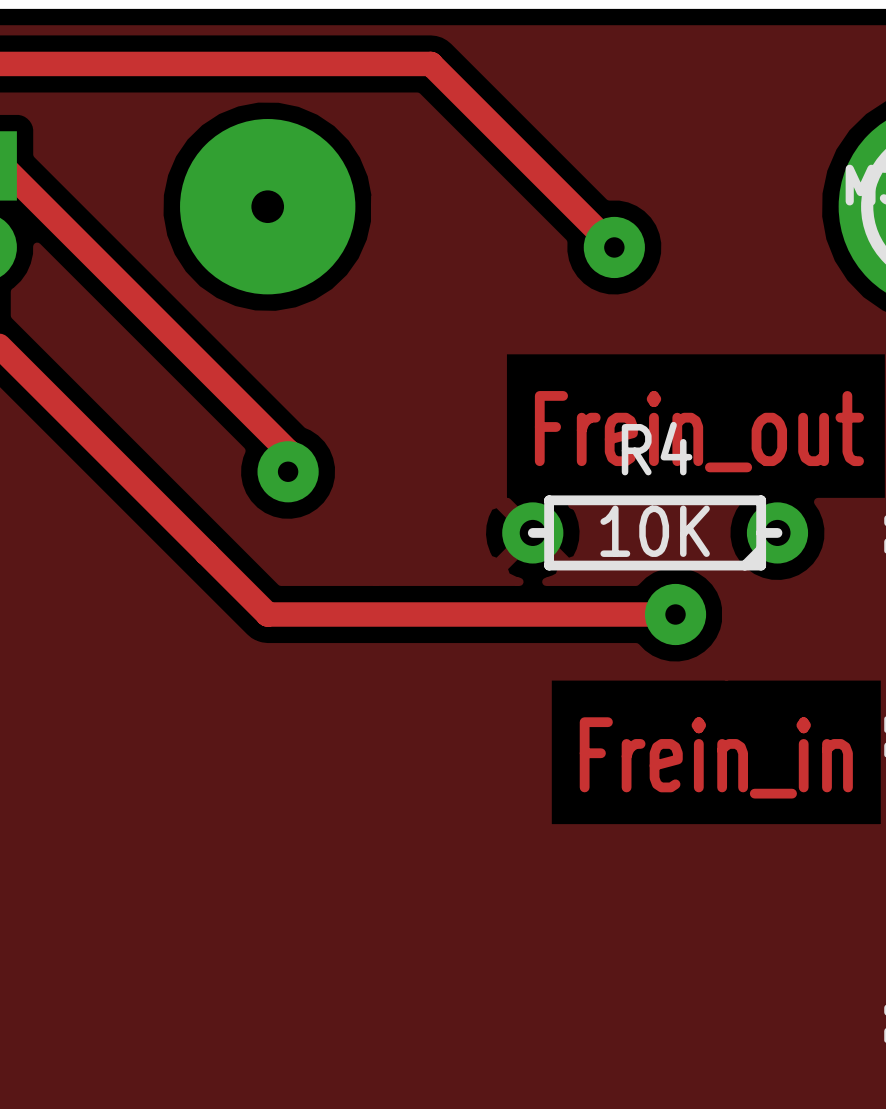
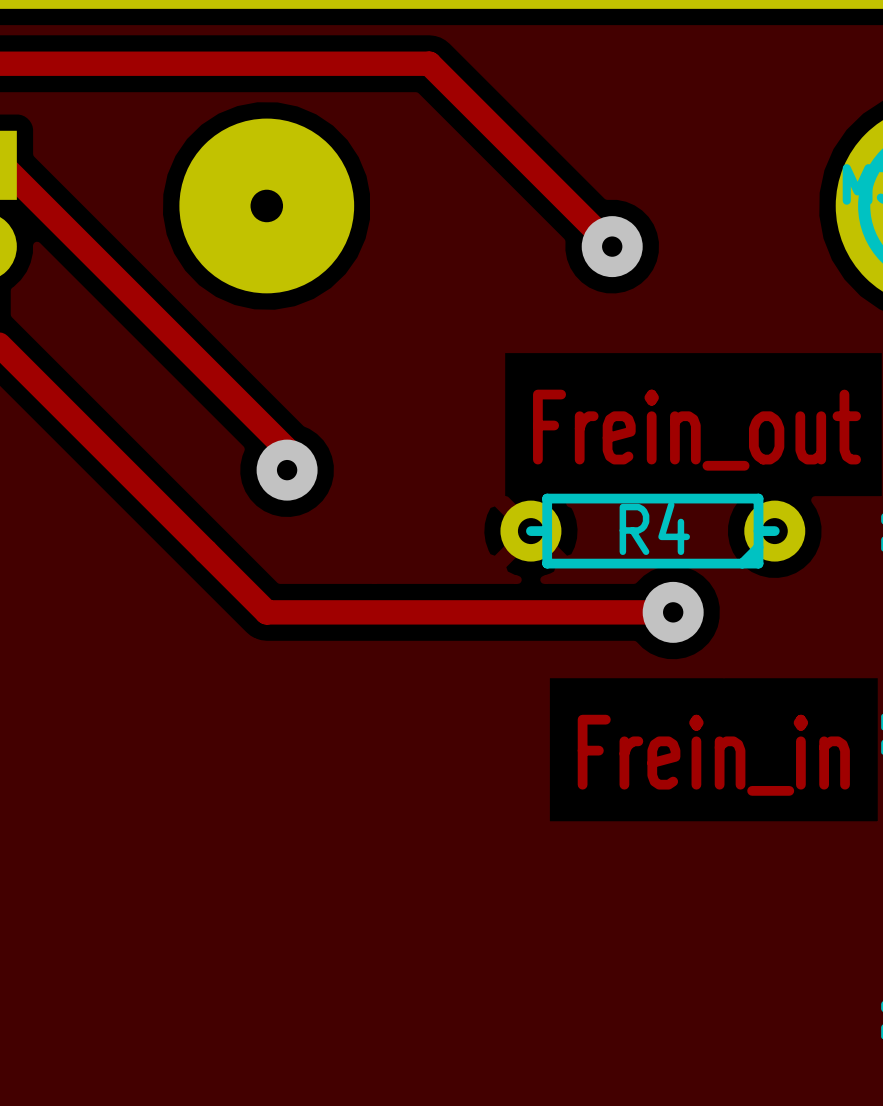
R4 name position: R4 (657, 448) -> R4 (654, 528)
R4 value: 10K (655, 531) -> none

